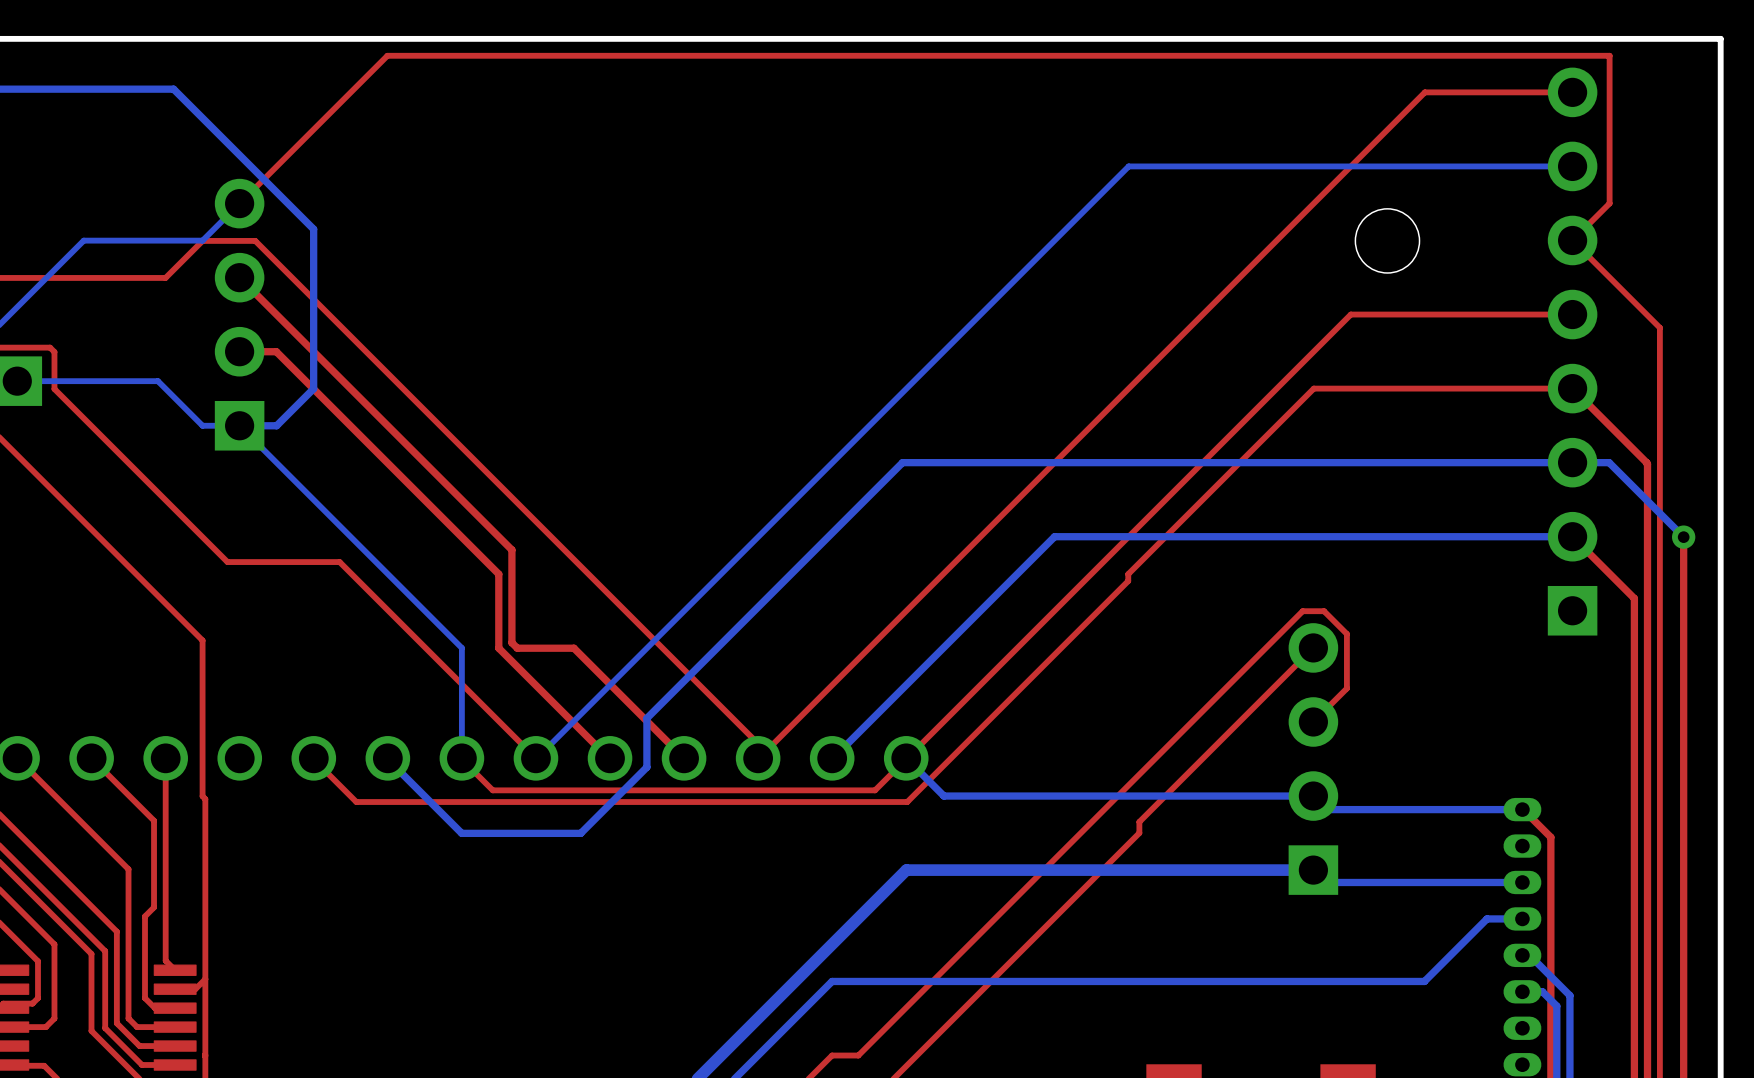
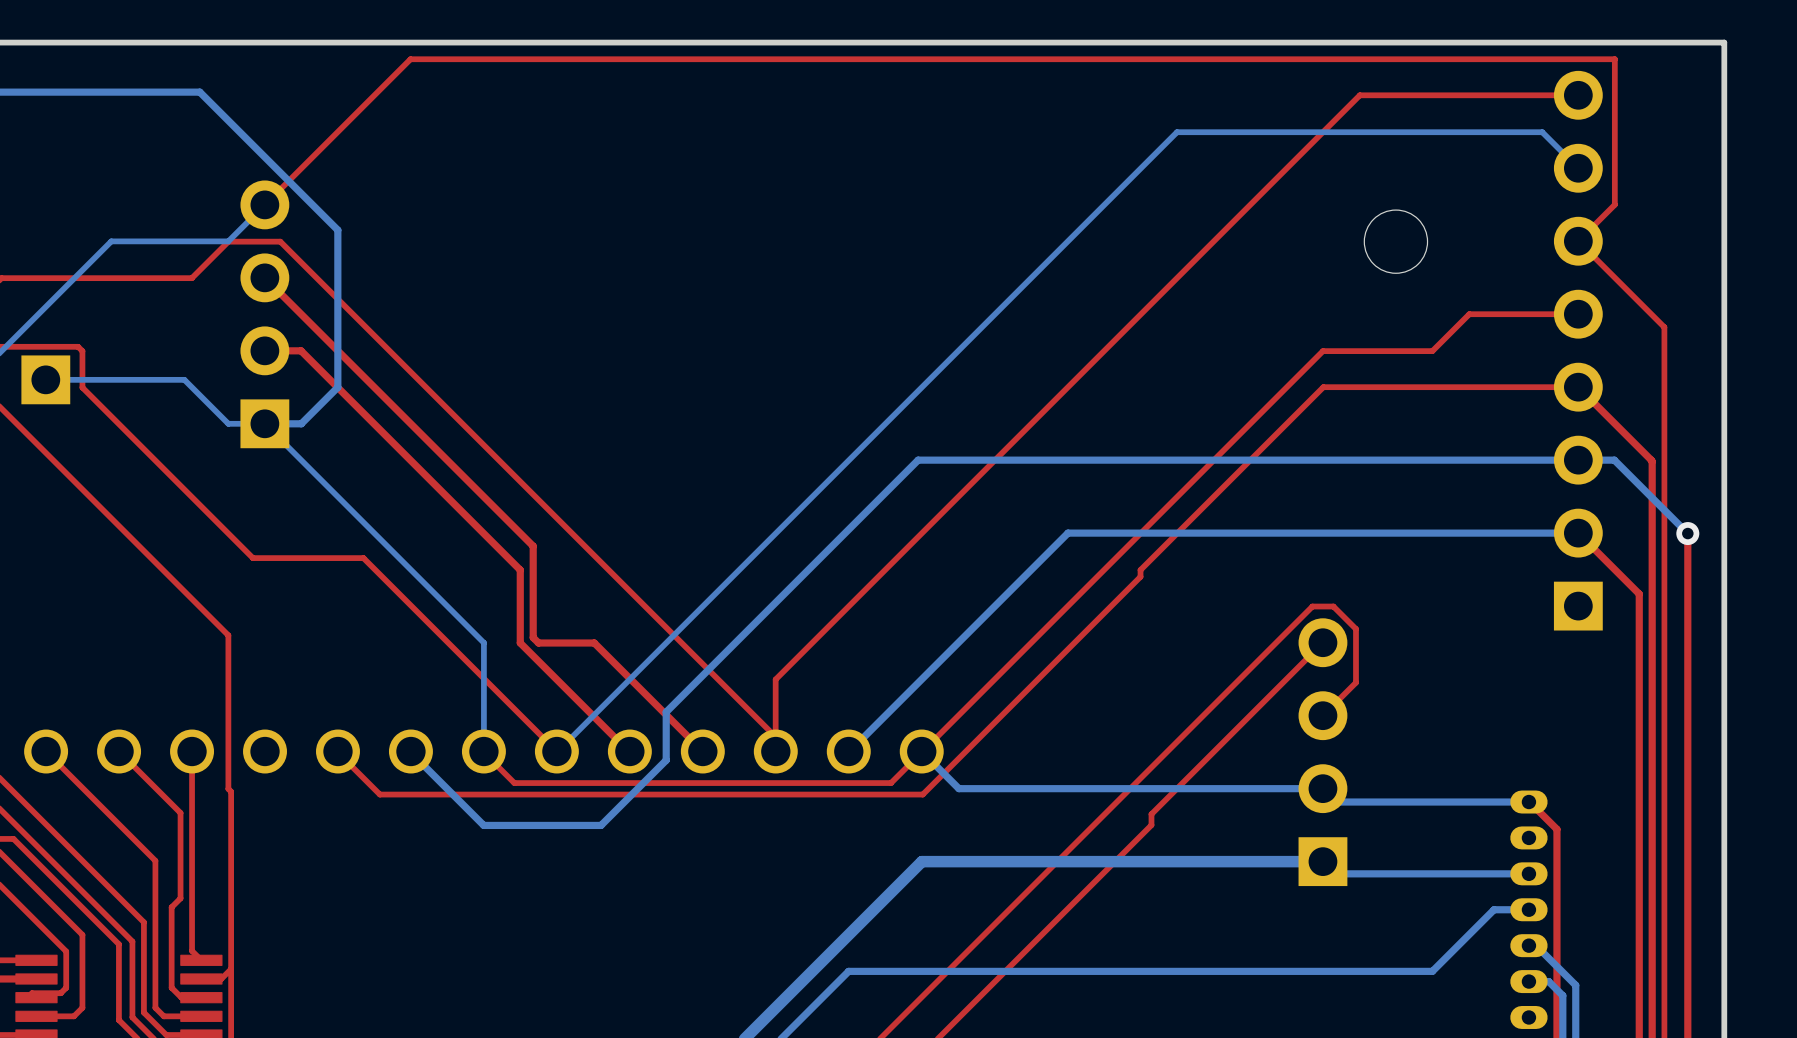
top track: (1424, 92) (757, 759) (757, 743) -> (1432, 95) (1359, 95) (775, 679) (775, 736)
bottom track: (1572, 166) (1128, 166) -> (1578, 168) (1542, 132) (1177, 132) (1140, 168)
top track: (1461, 314) (1350, 314) (1313, 352) -> (1469, 314) (1432, 351) (1322, 351)

